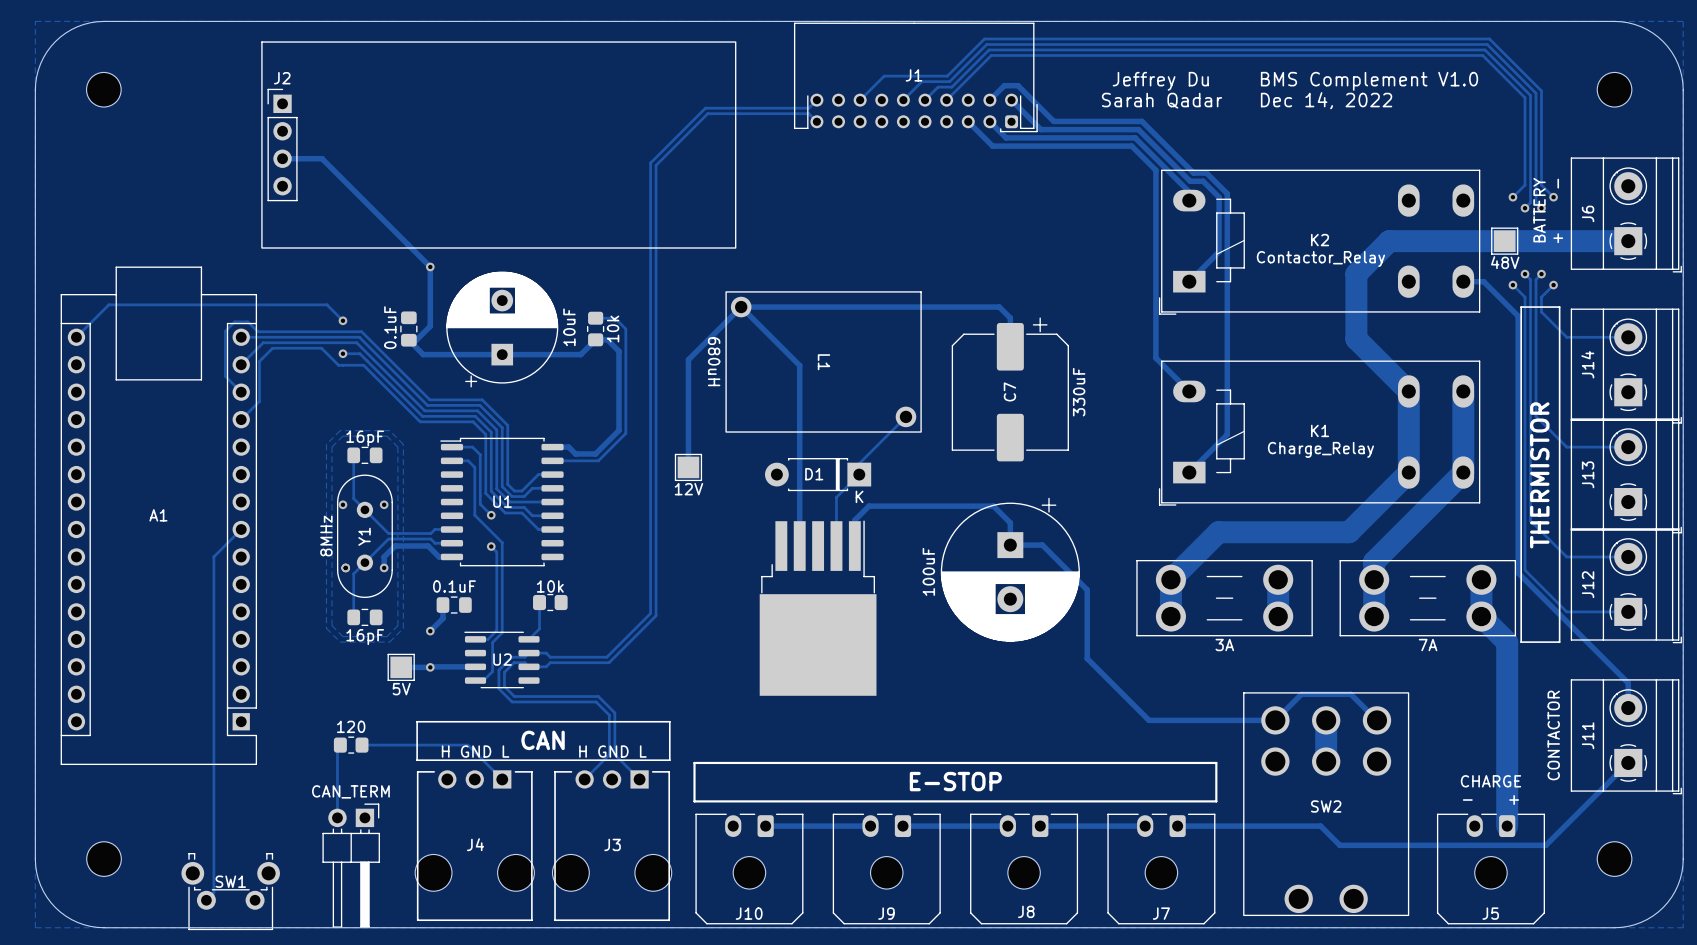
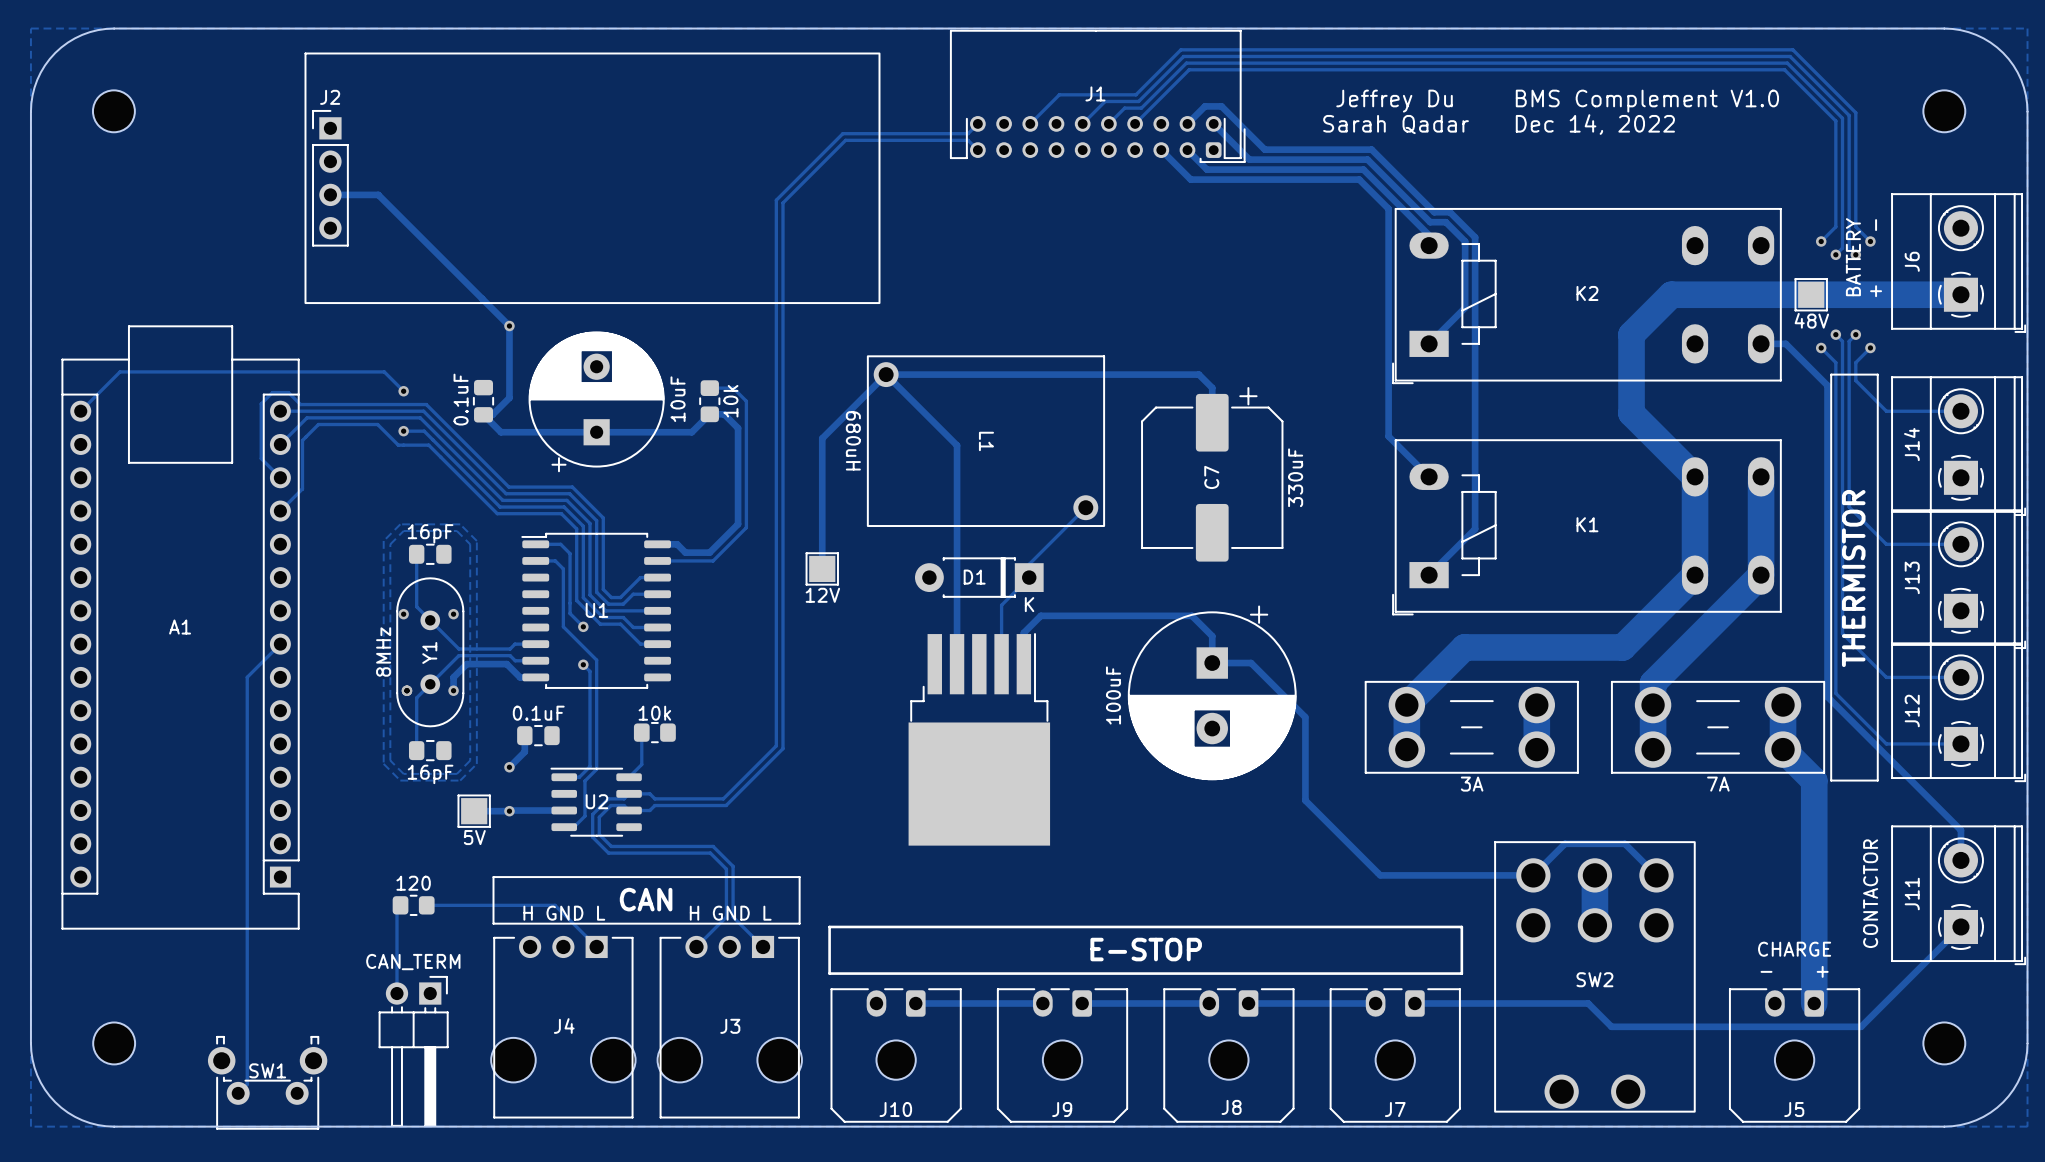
K2 value: Contactor_Relay (1320, 259) -> none
K1 value: Charge_Relay (1320, 449) -> none

